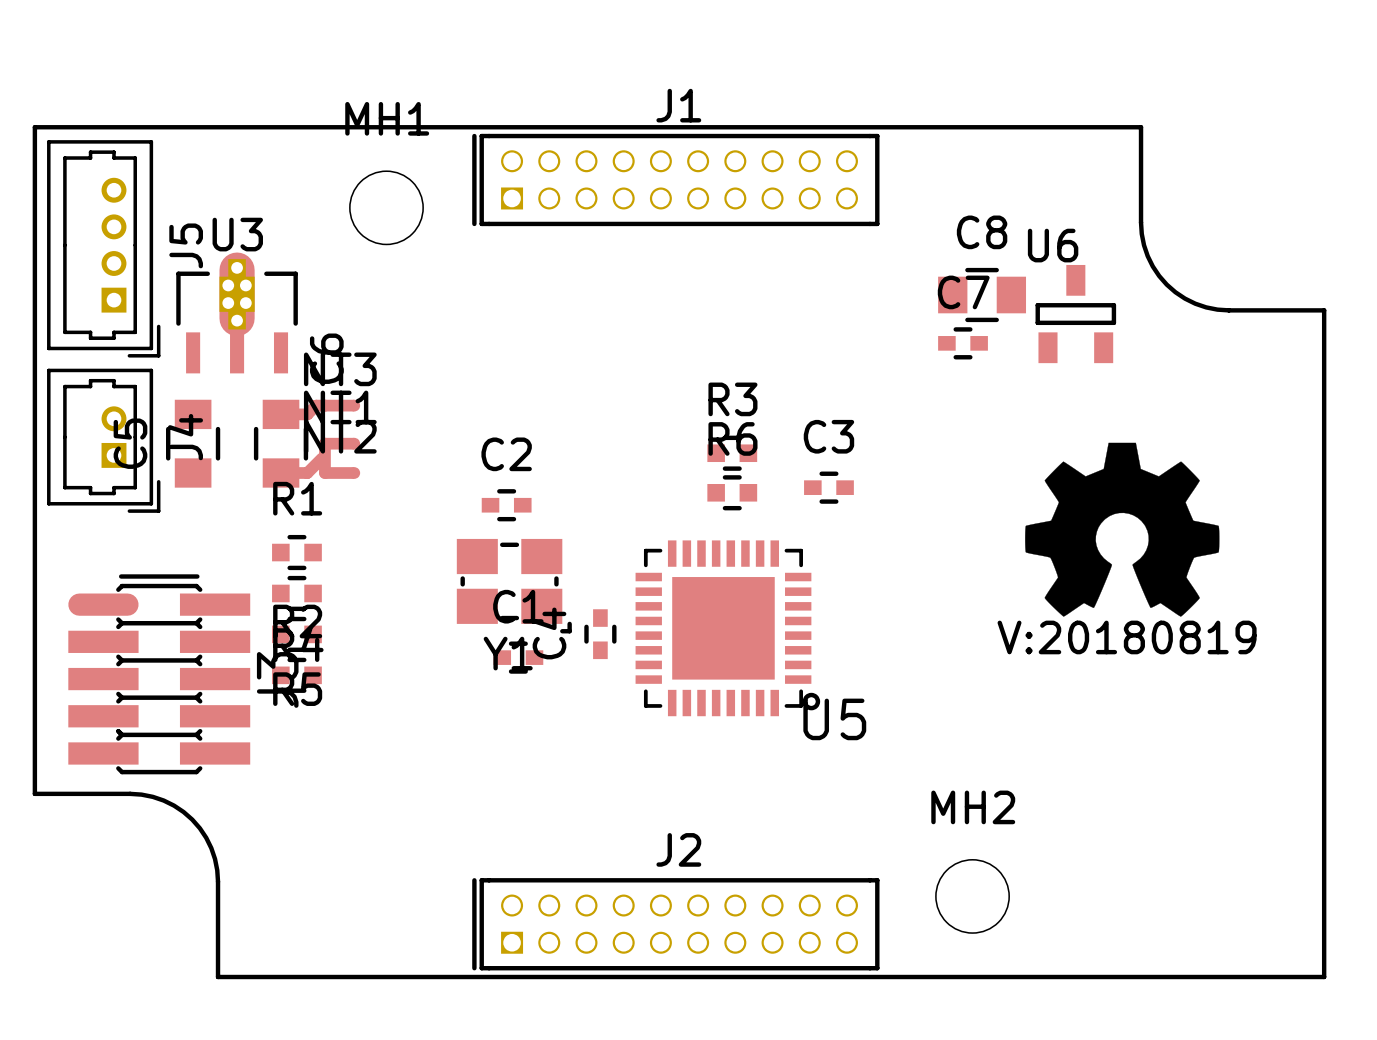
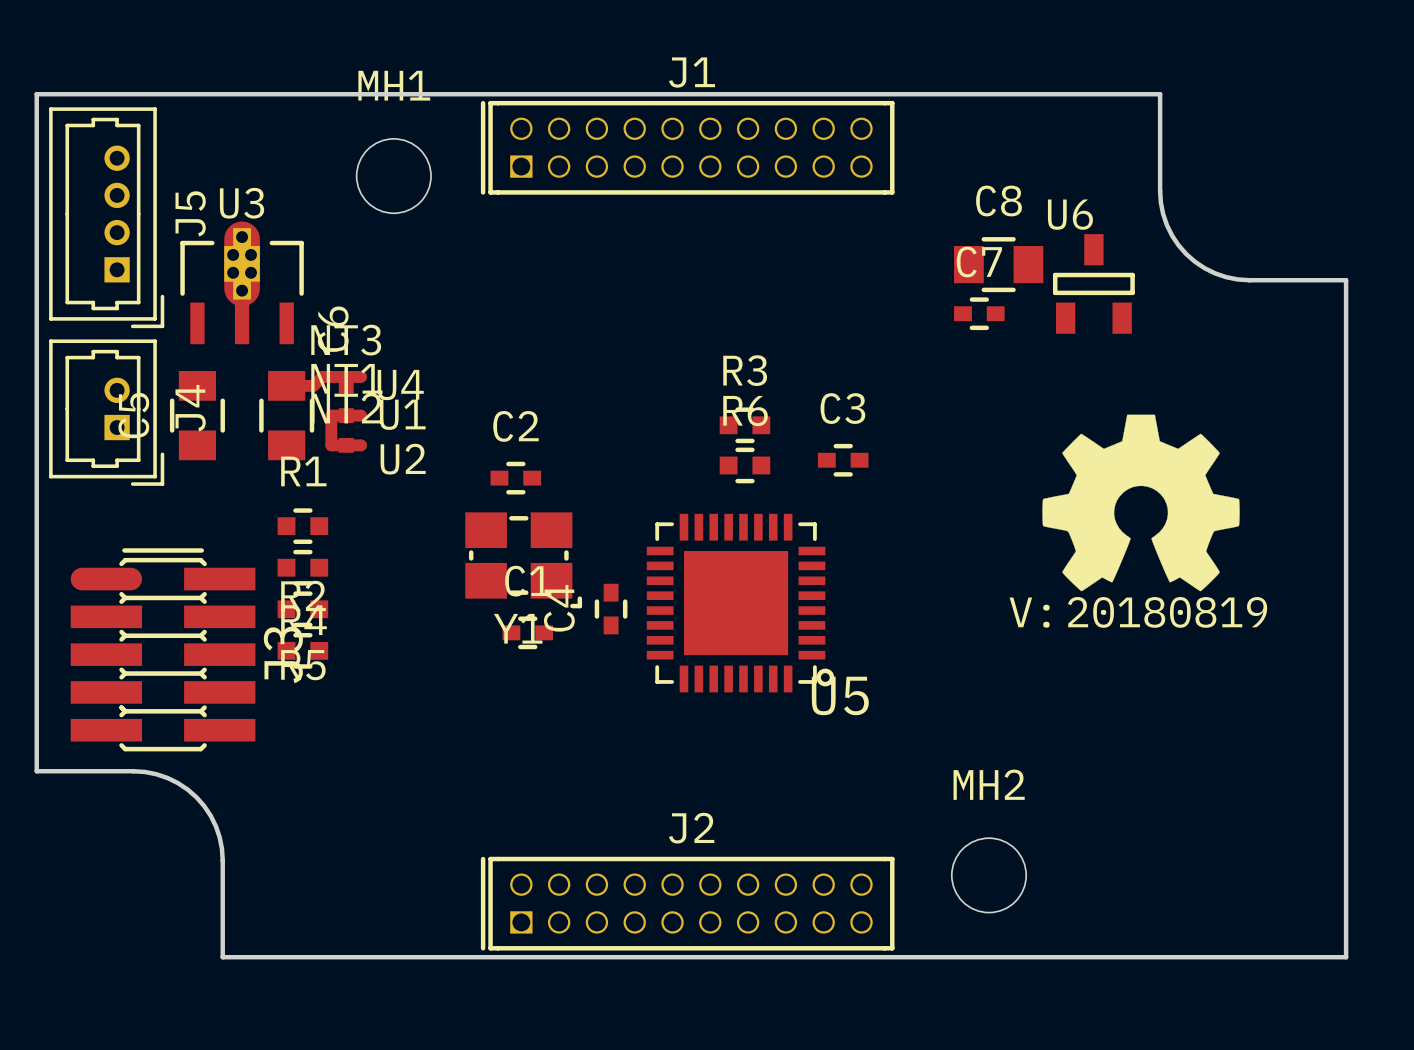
U4: none -> (346, 385)
U1: none -> (346, 415)
top track: (322, 458) (307, 473) (281, 473) -> none
U2: none -> (346, 445)

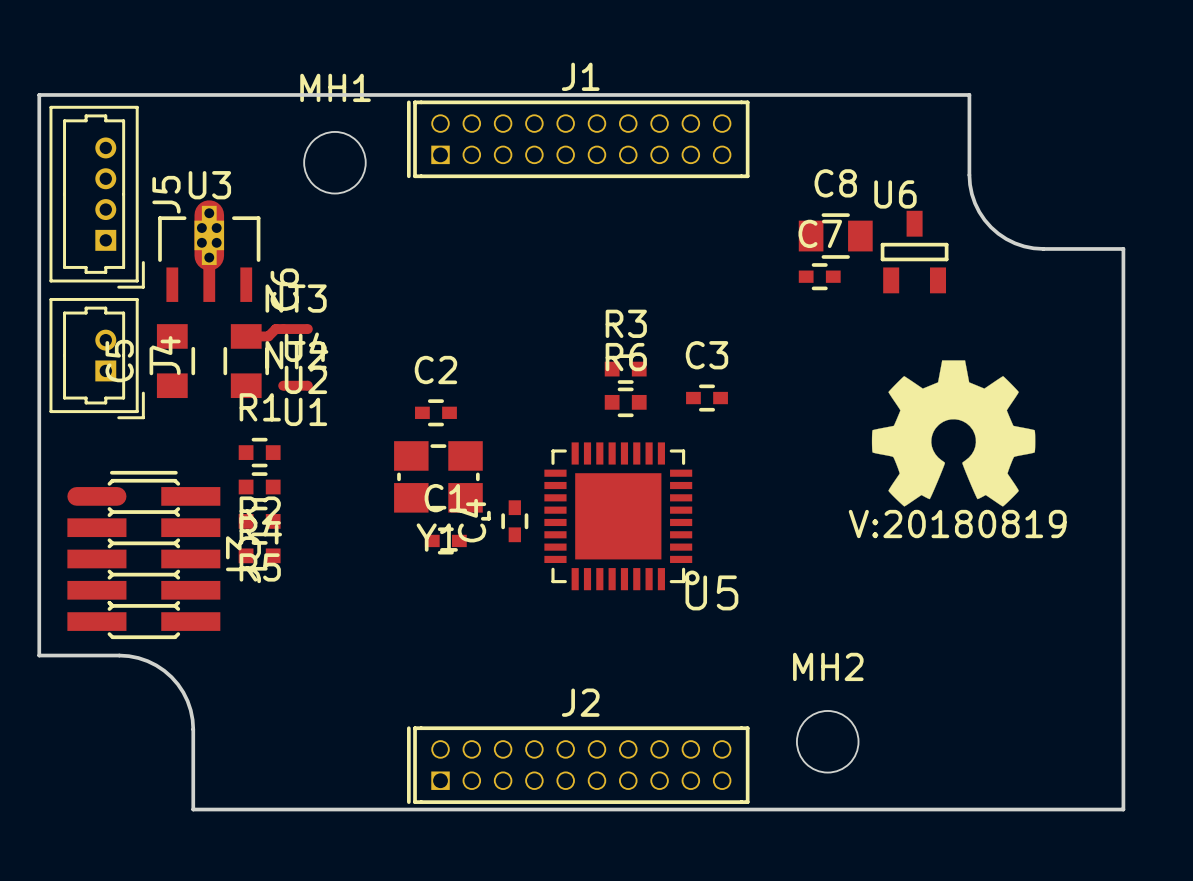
U4 footprint: [338, 378, 354, 394] -> [284, 332, 329, 363]
U1 footprint: [338, 408, 354, 424] -> [284, 397, 328, 427]
top track: (331, 415) (331, 445) -> none
NT1: (346, 415) -> none
U2 footprint: [338, 437, 354, 453] -> [284, 365, 328, 395]

